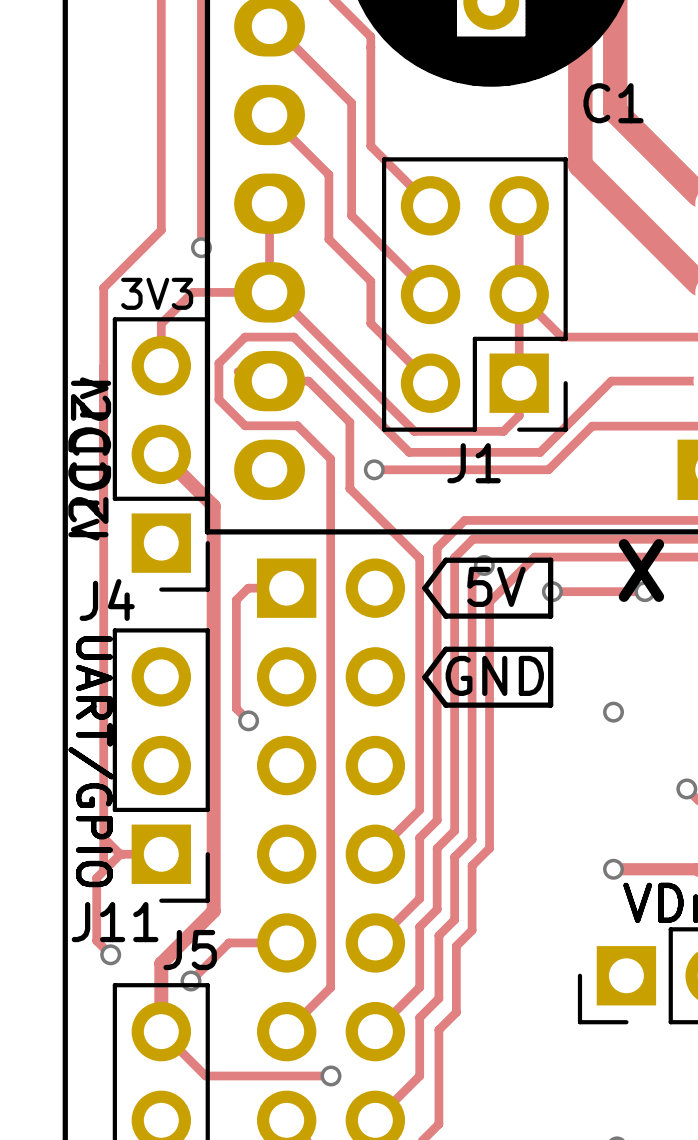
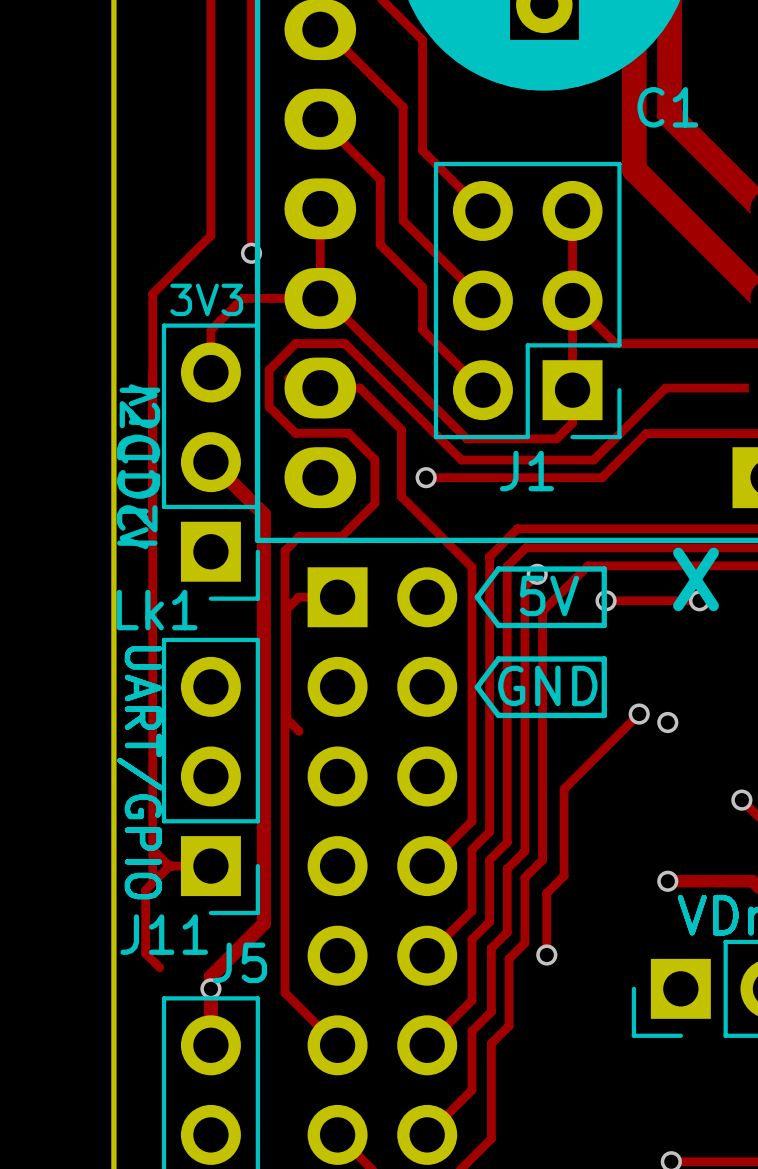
track: (323, 451) (330, 458) (330, 987) (286, 1031) -> (374, 459) (374, 503) (341, 536) (299, 536) (285, 550) (285, 992) (337, 1045)
J4 name: J4 (107, 600) -> Lk1 (157, 610)
track: none -> (639, 714) (564, 789) (564, 875) (546, 893) (546, 954)
via: none -> (639, 714)
via: (248, 720) -> none
track: (286, 942) (229, 942) (190, 981) -> none
via: none -> (546, 954)
via: (110, 954) -> none
via: none -> (210, 988)
via: (190, 981) -> none
track: (161, 1031) (205, 1075) (331, 1075) -> none
via: (331, 1075) -> none

